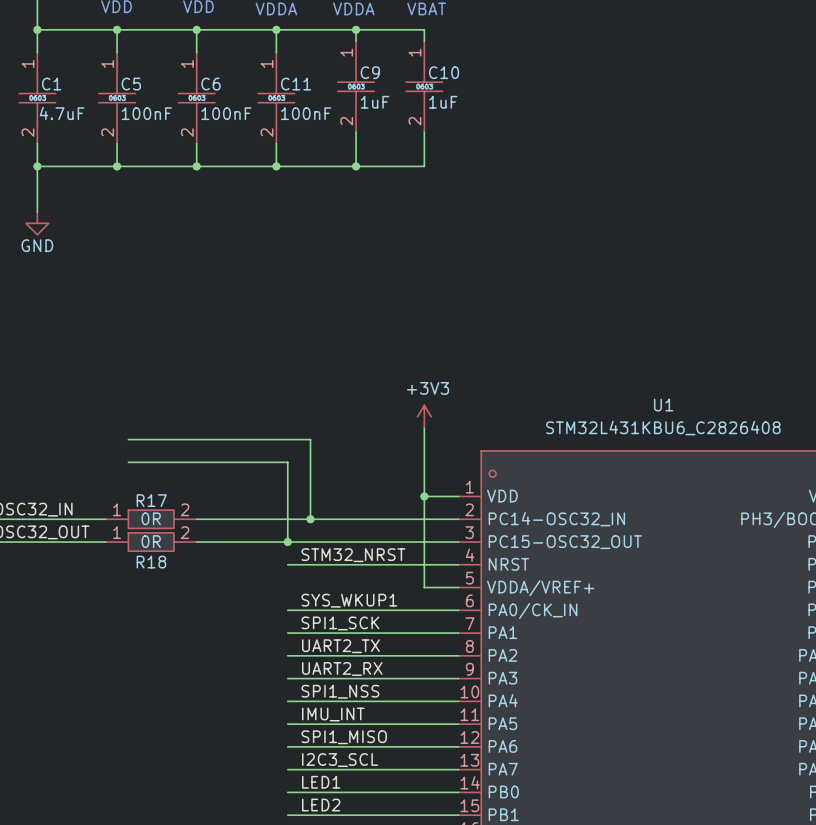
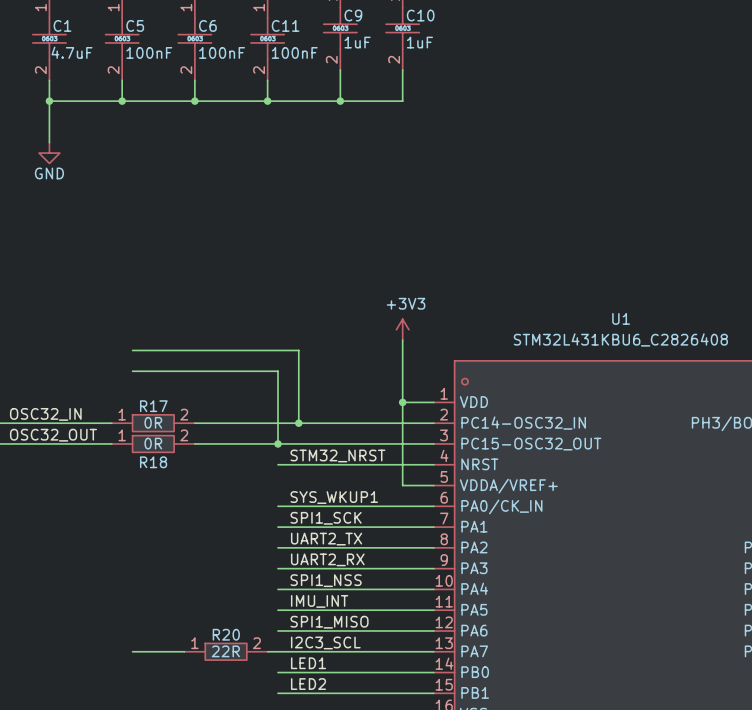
wire: none -> (132, 651) (184, 651)
R20: none -> (226, 651)
wire: none -> (267, 651) (278, 651)

